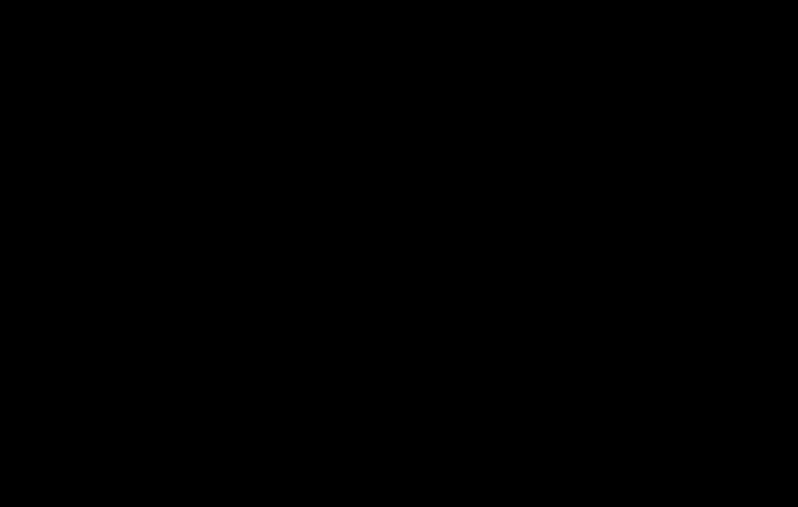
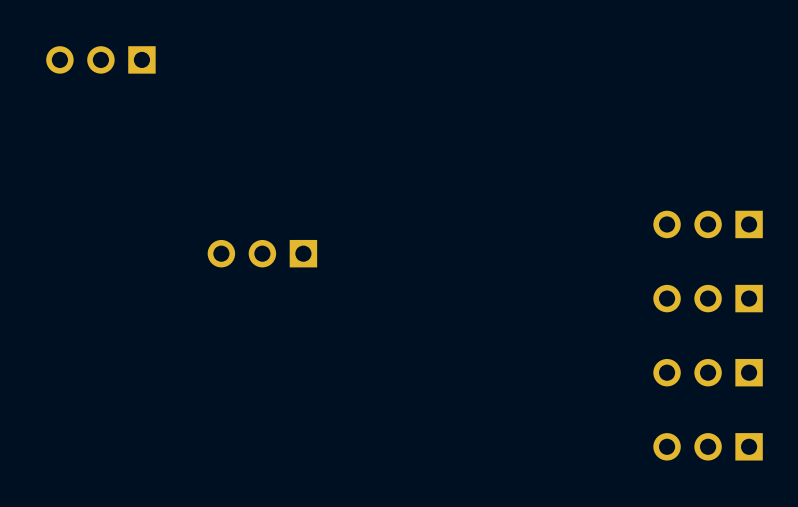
part: none -> (100, 59)
part: none -> (708, 224)
part: none -> (262, 253)
part: none -> (708, 298)
part: none -> (708, 372)
part: none -> (708, 446)

